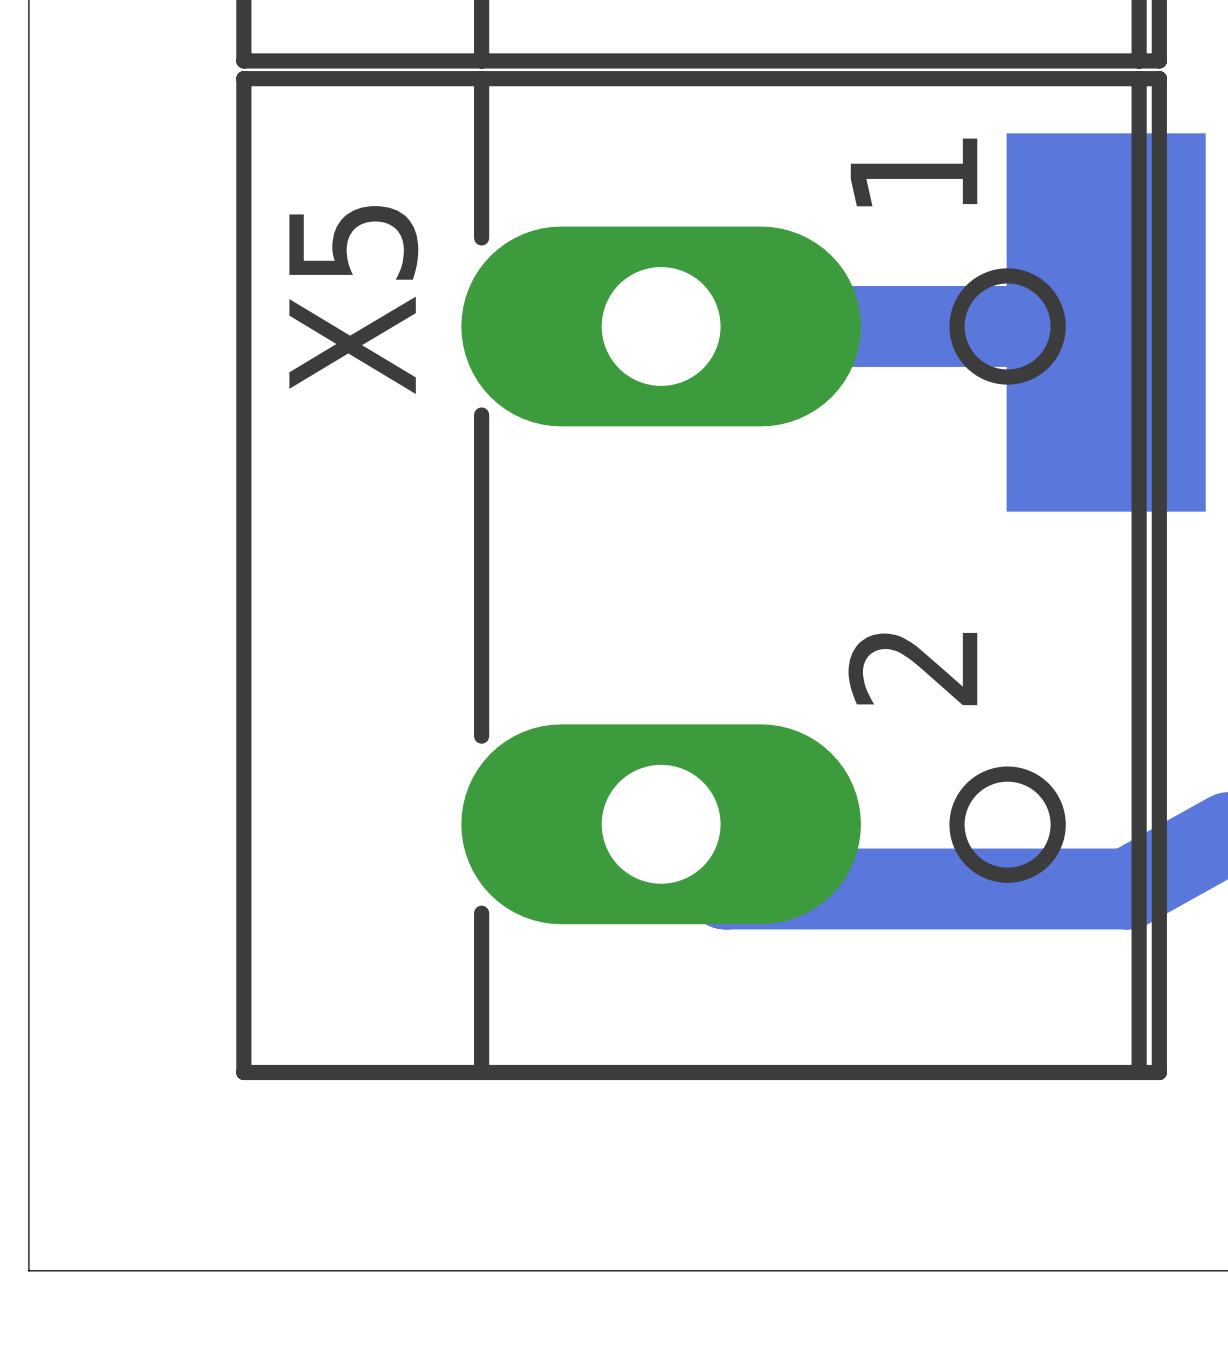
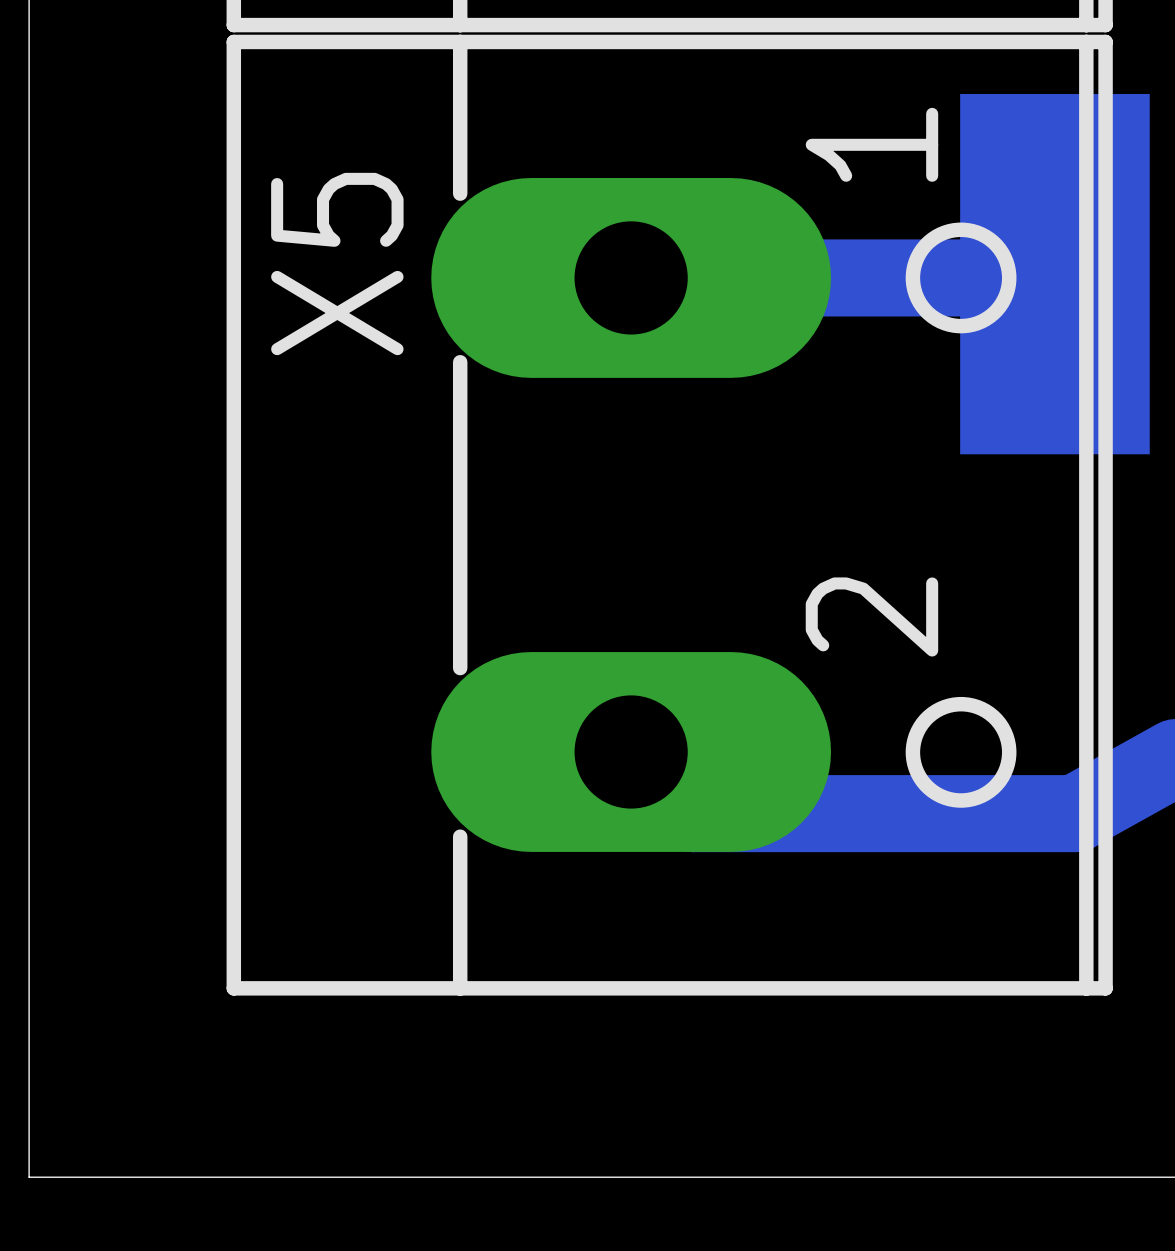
X5 footprint: [236, 71, 1167, 1081] -> [226, 34, 1113, 996]

